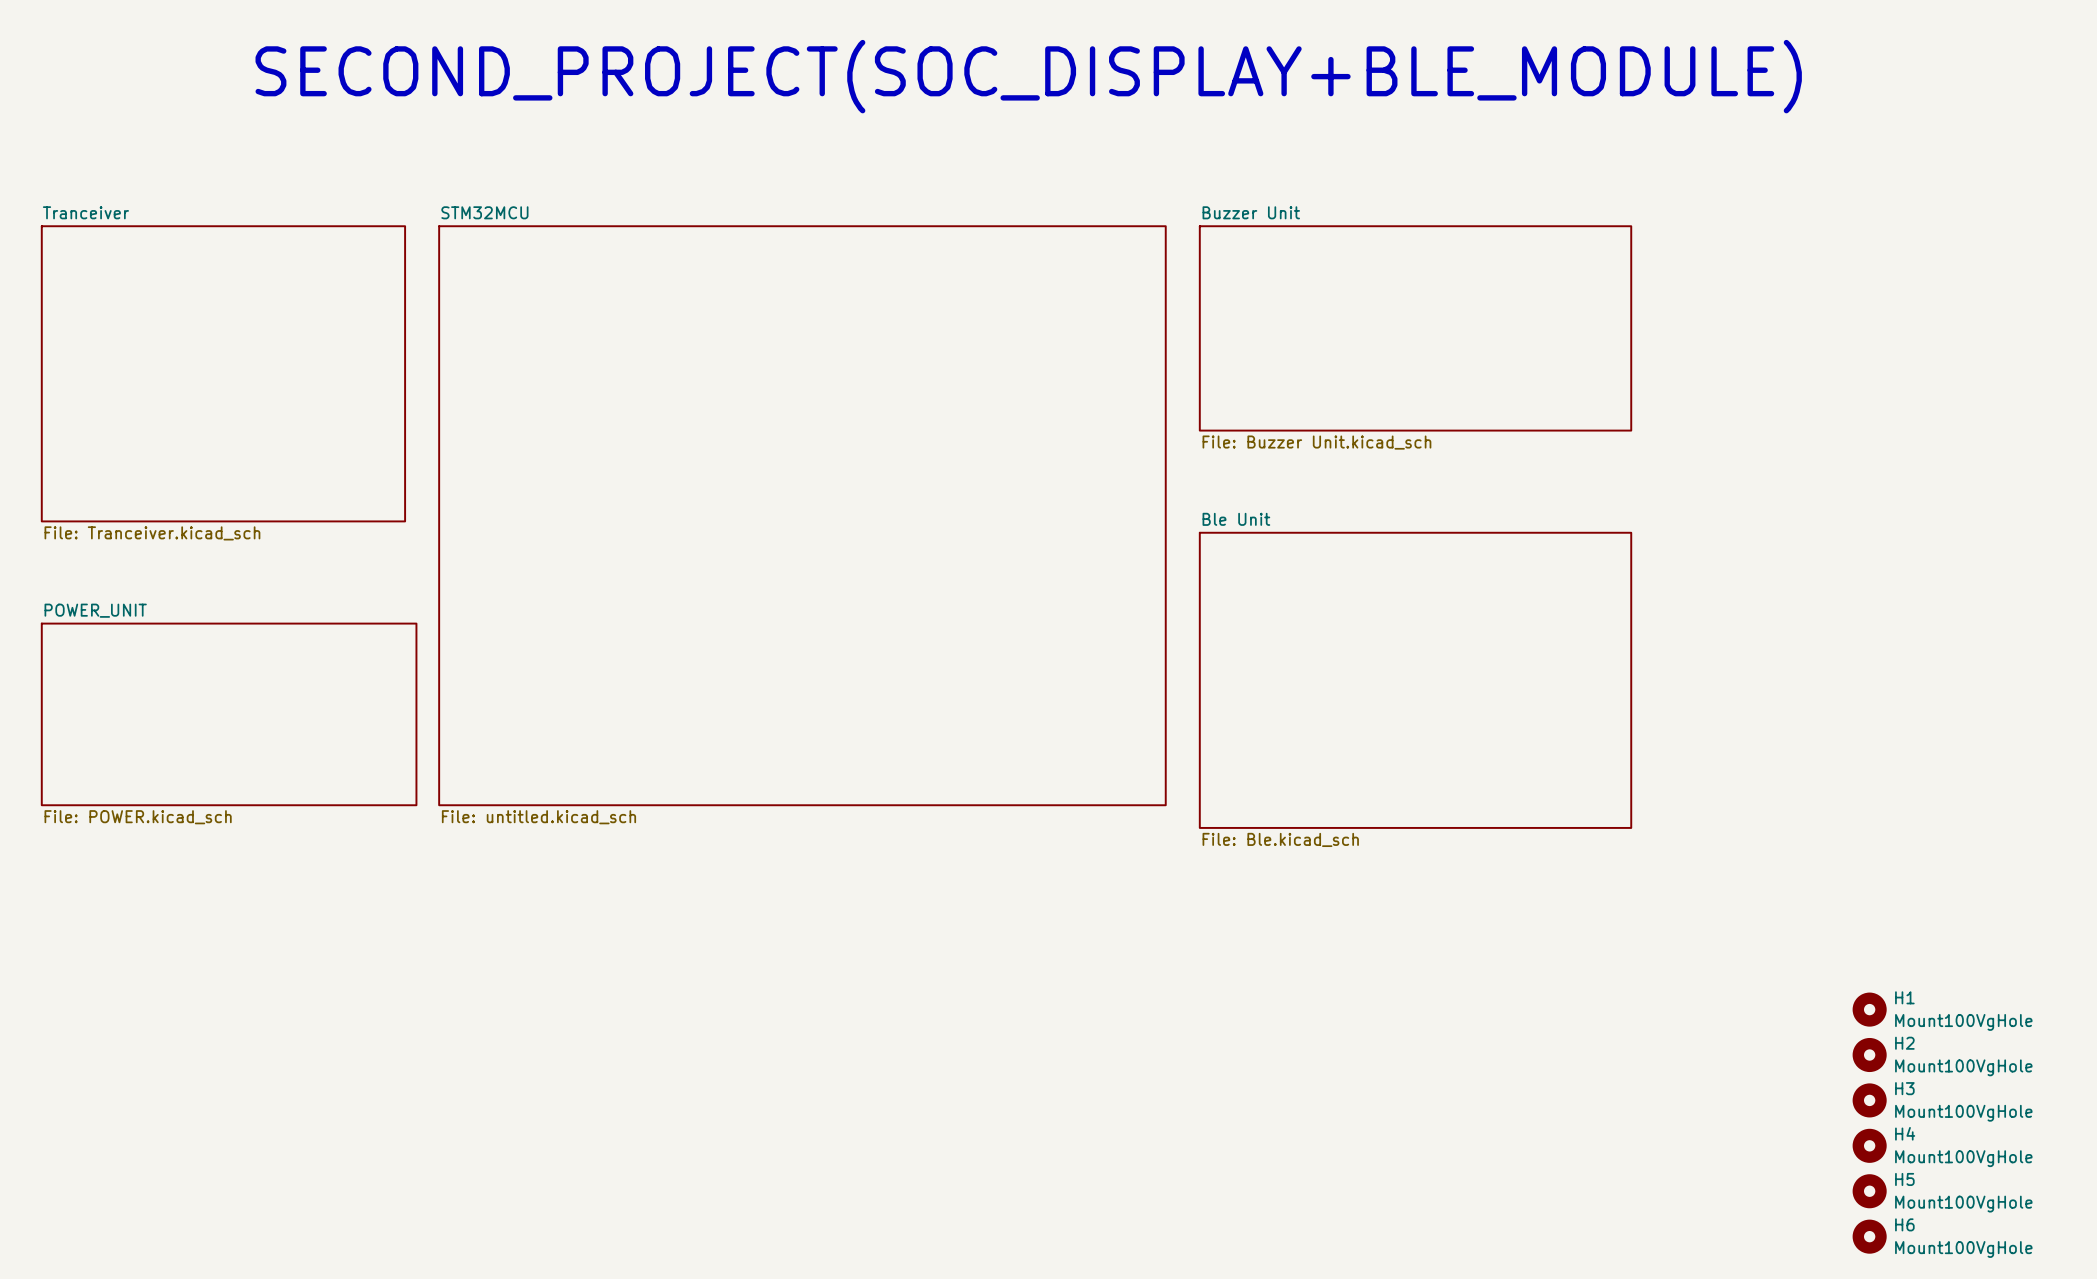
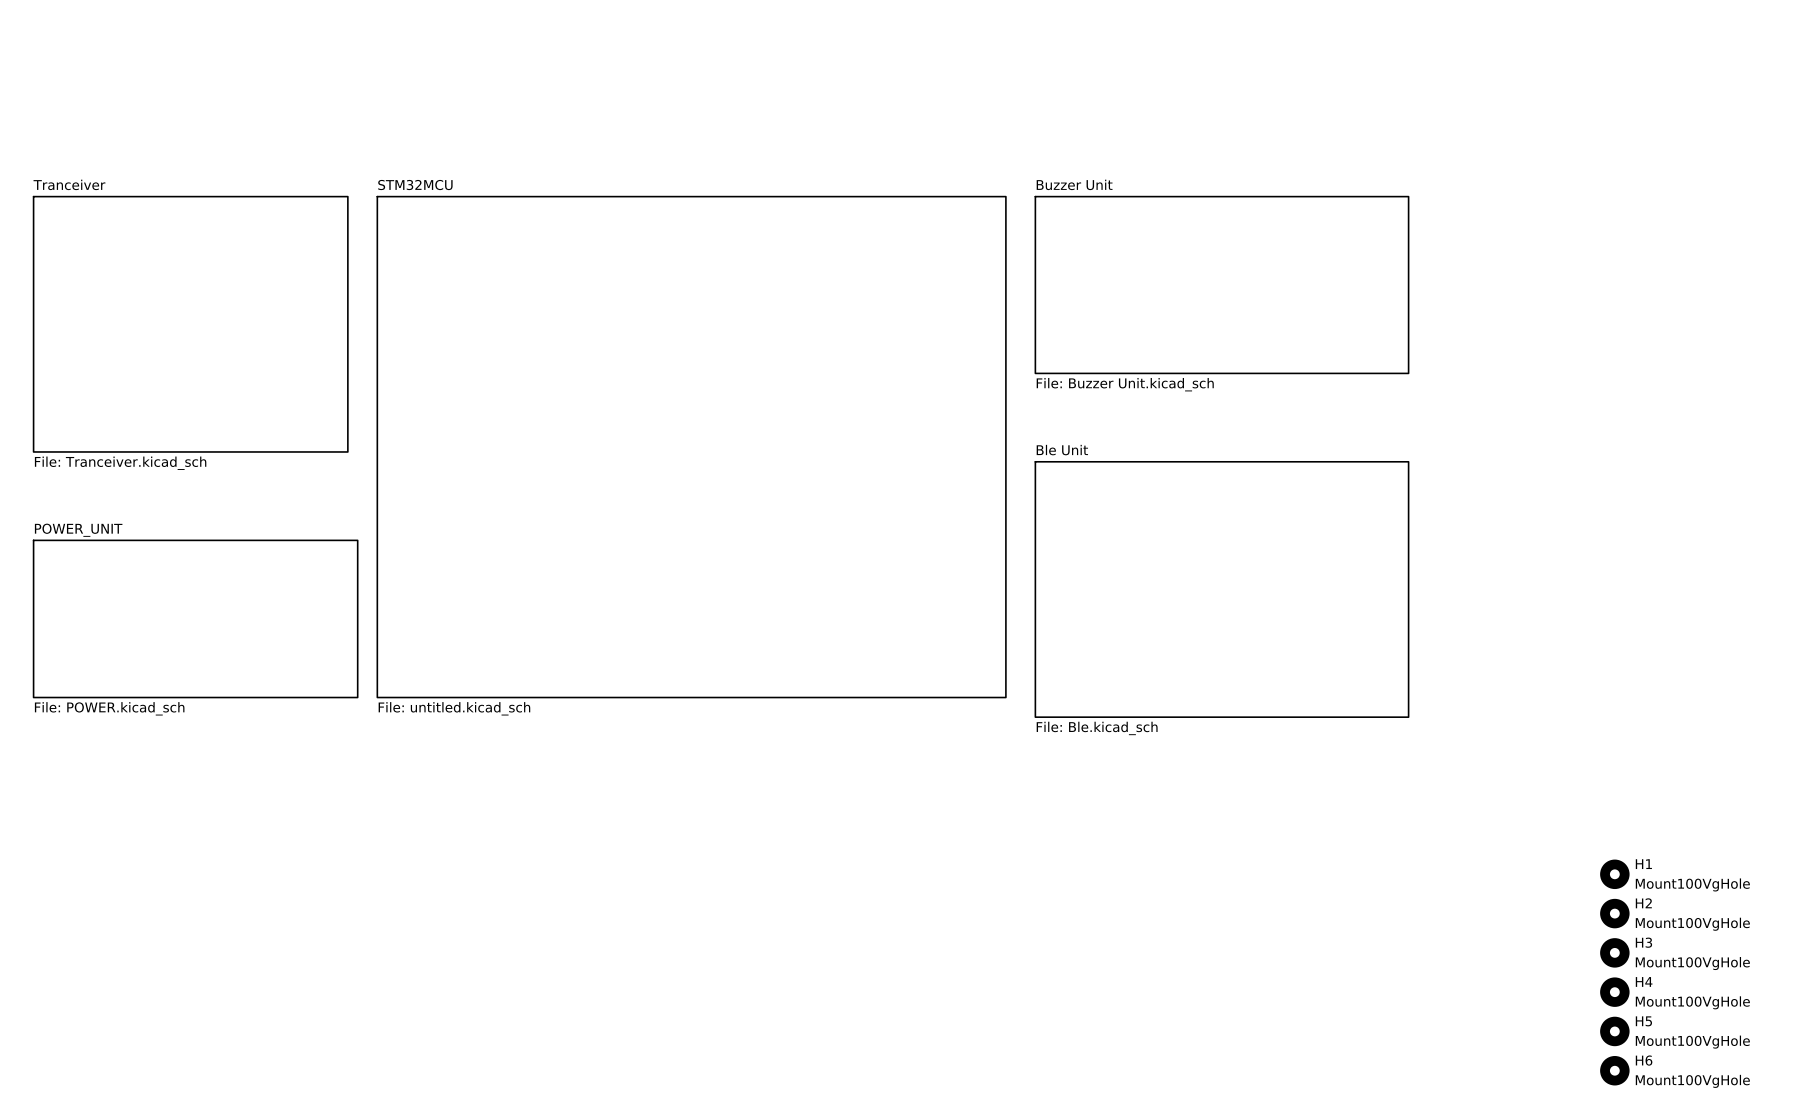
text: SECOND_PROJECT(SOC_DISPLAY+BLE_MODULE) (1028, 76) -> none

